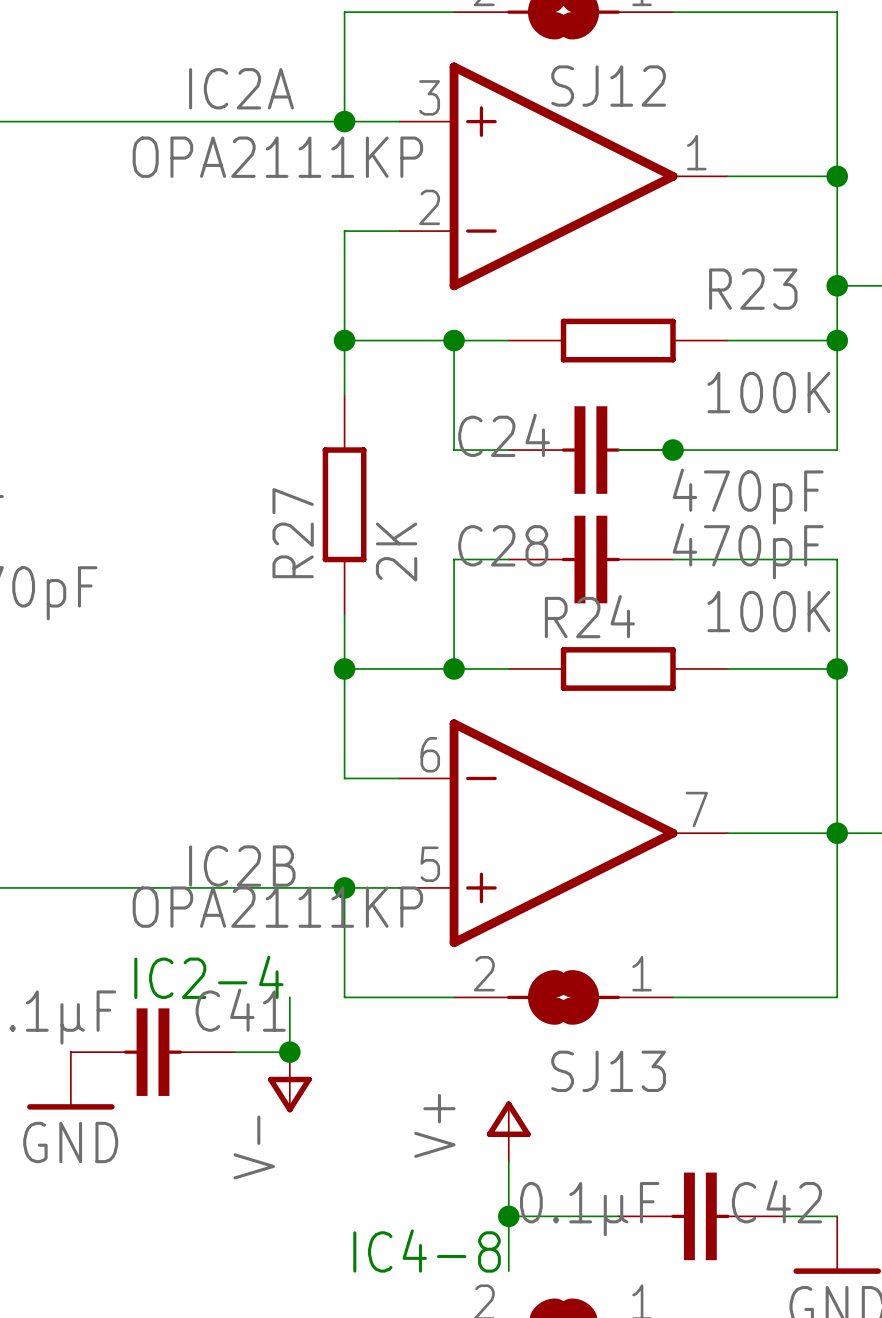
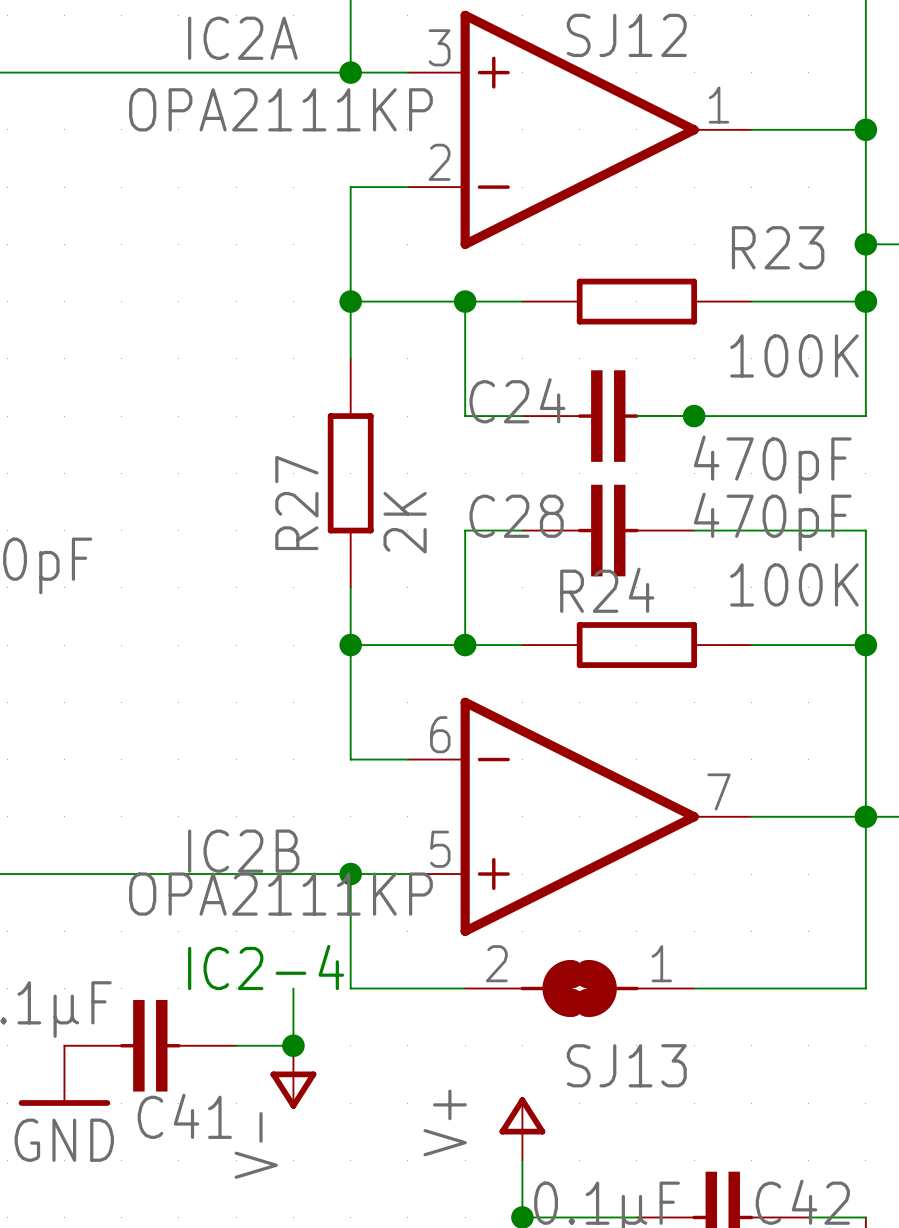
text position: IC2-4 (208, 977) -> IC2-4 (266, 967)
C41 name position: C41 (240, 1010) -> C41 (184, 1116)

